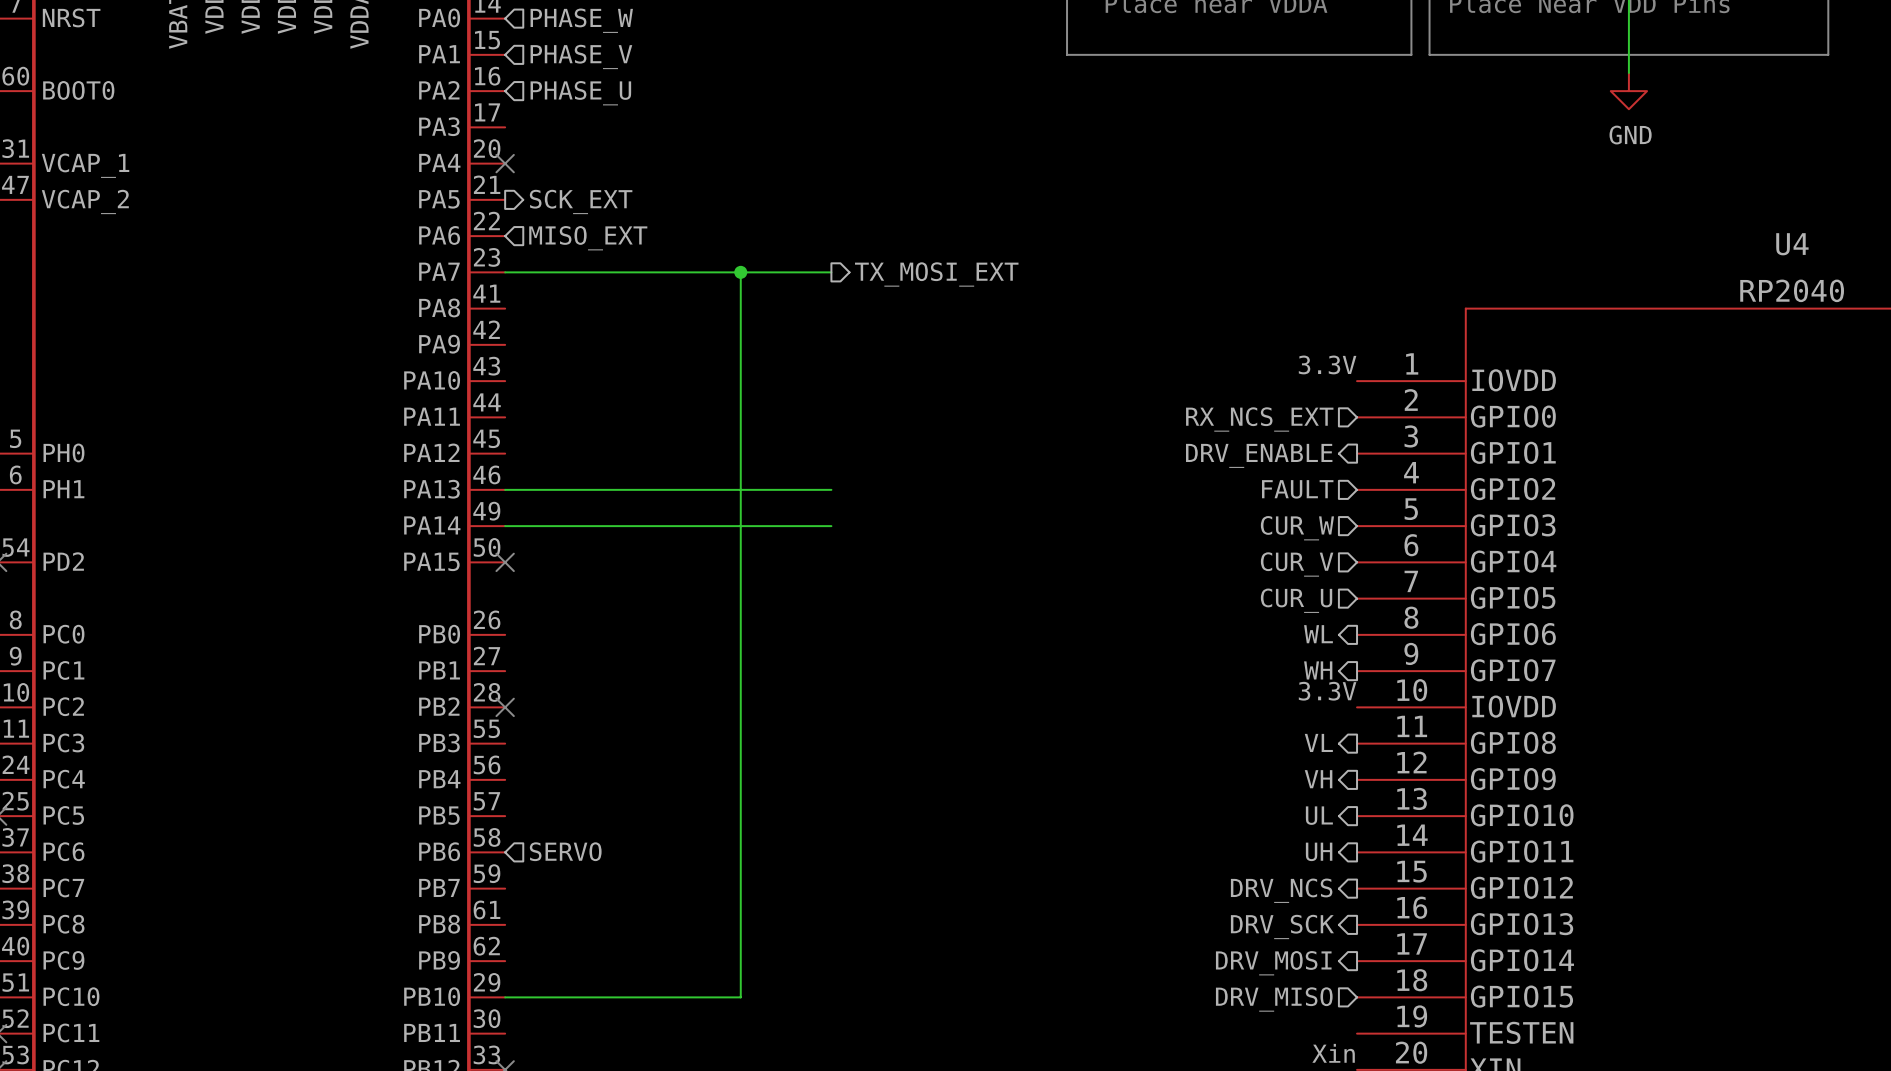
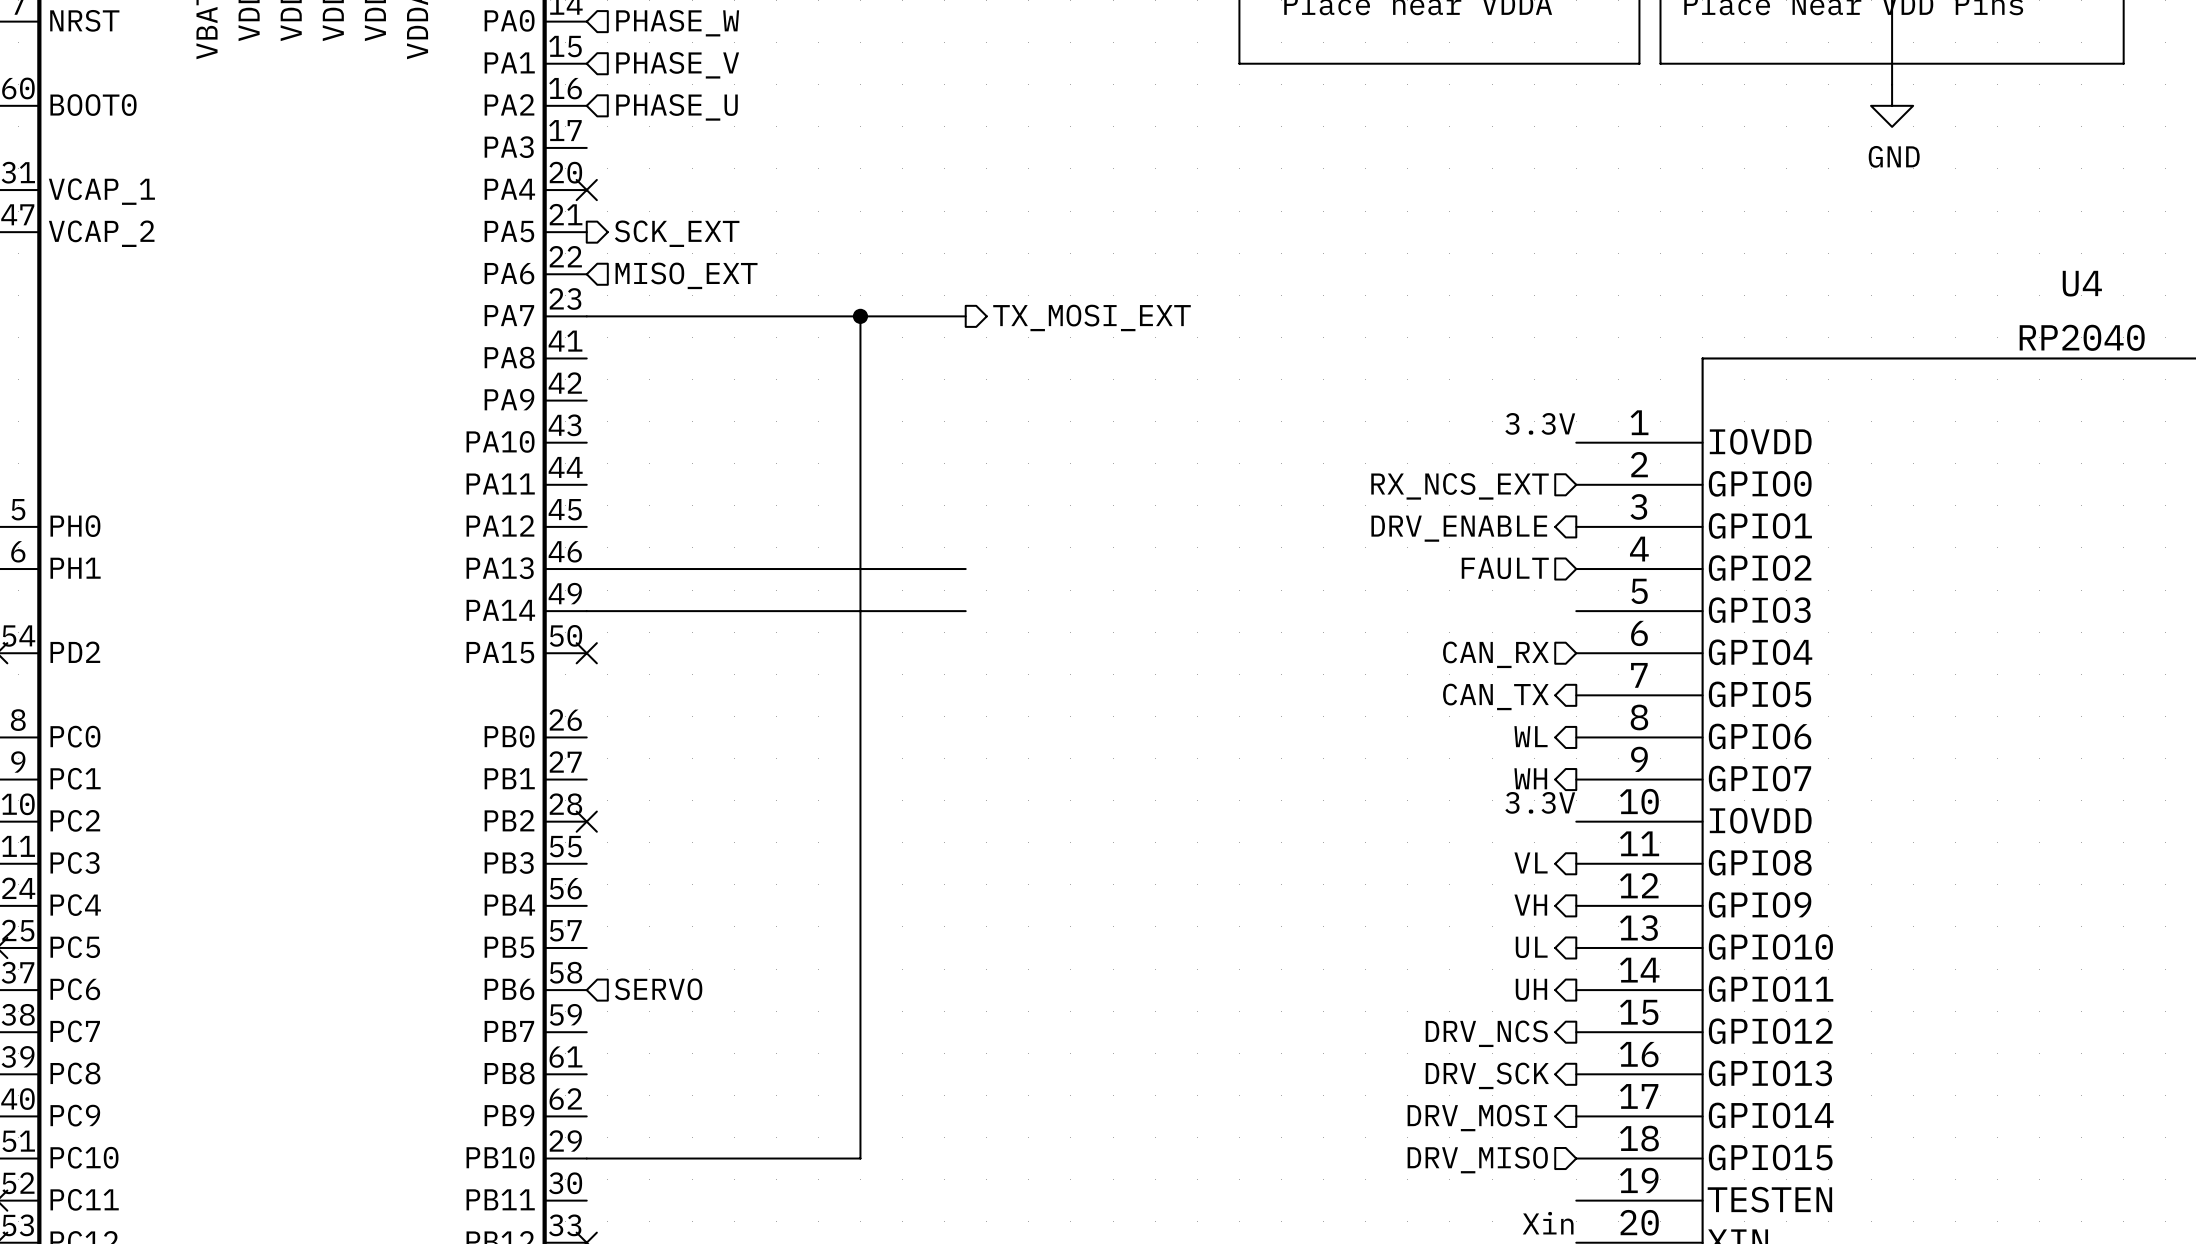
hierarchical label: CUR_W (1297, 528) -> none
hierarchical label: CUR_V (1297, 564) -> CAN_RX (1495, 654)
hierarchical label shape: input (1296, 600) -> output (1495, 696)
hierarchical label: CUR_U (1296, 600) -> CAN_TX (1495, 696)

